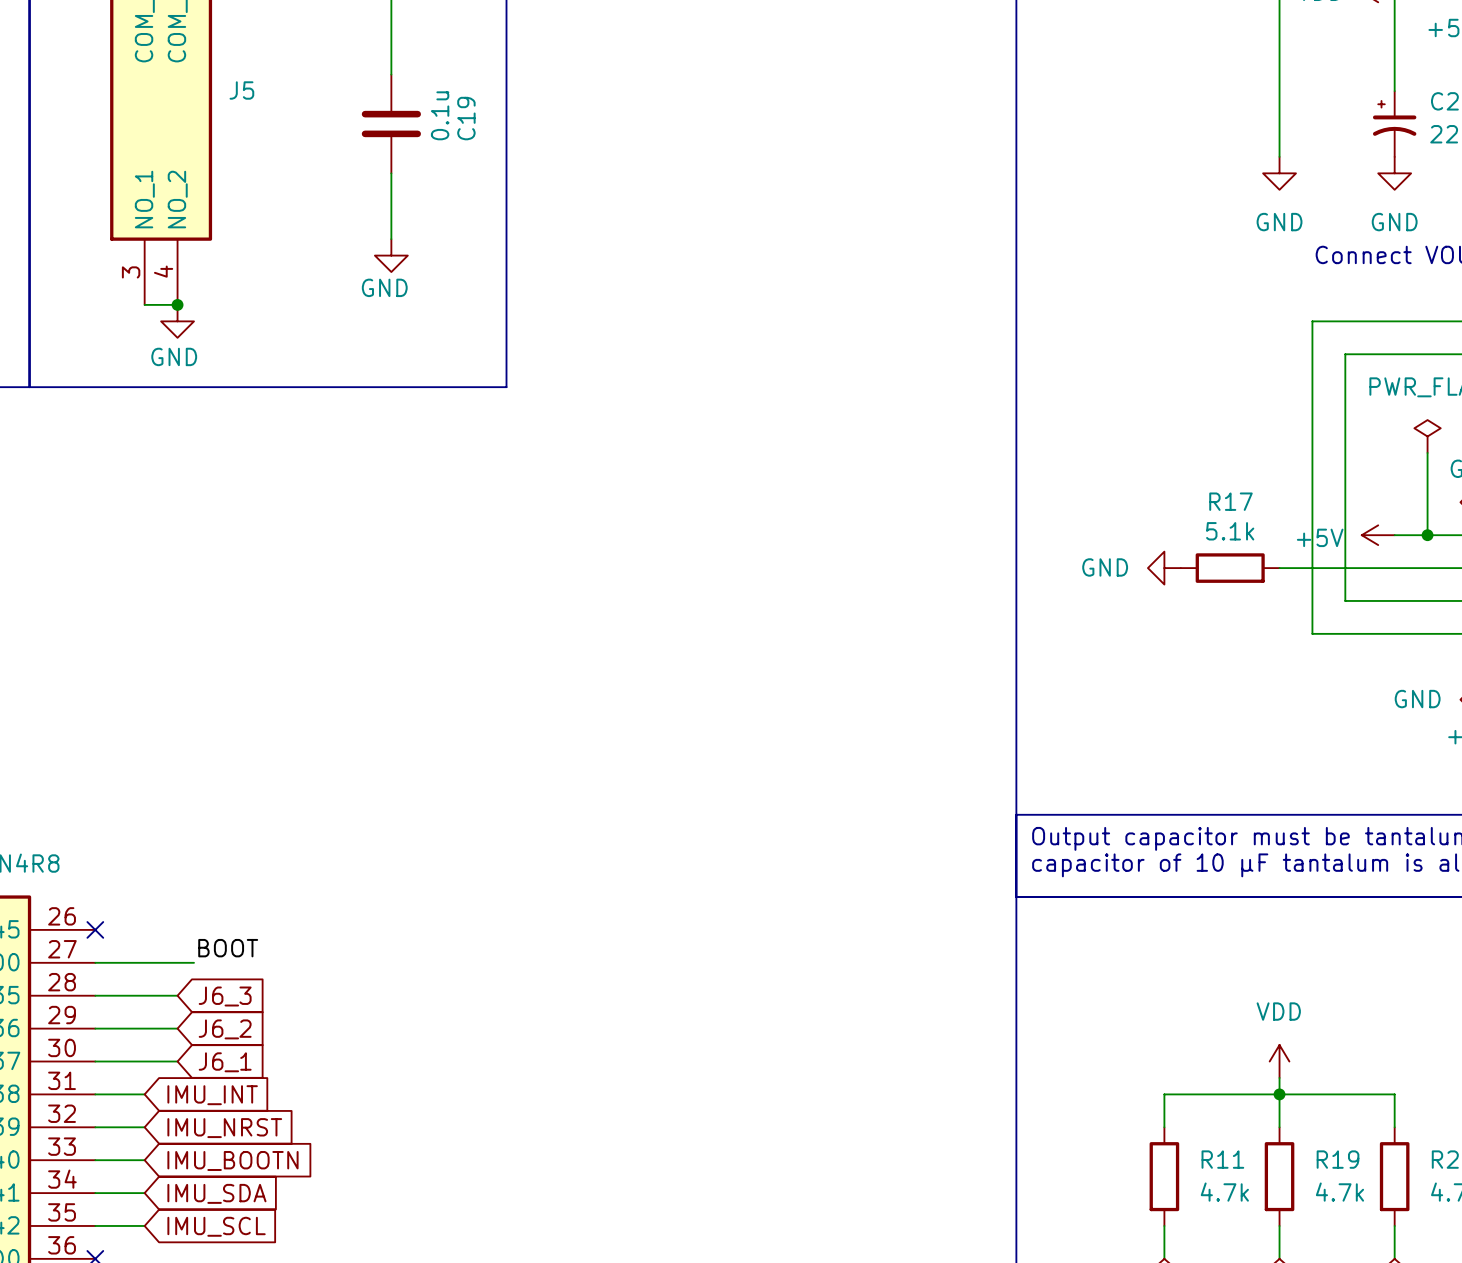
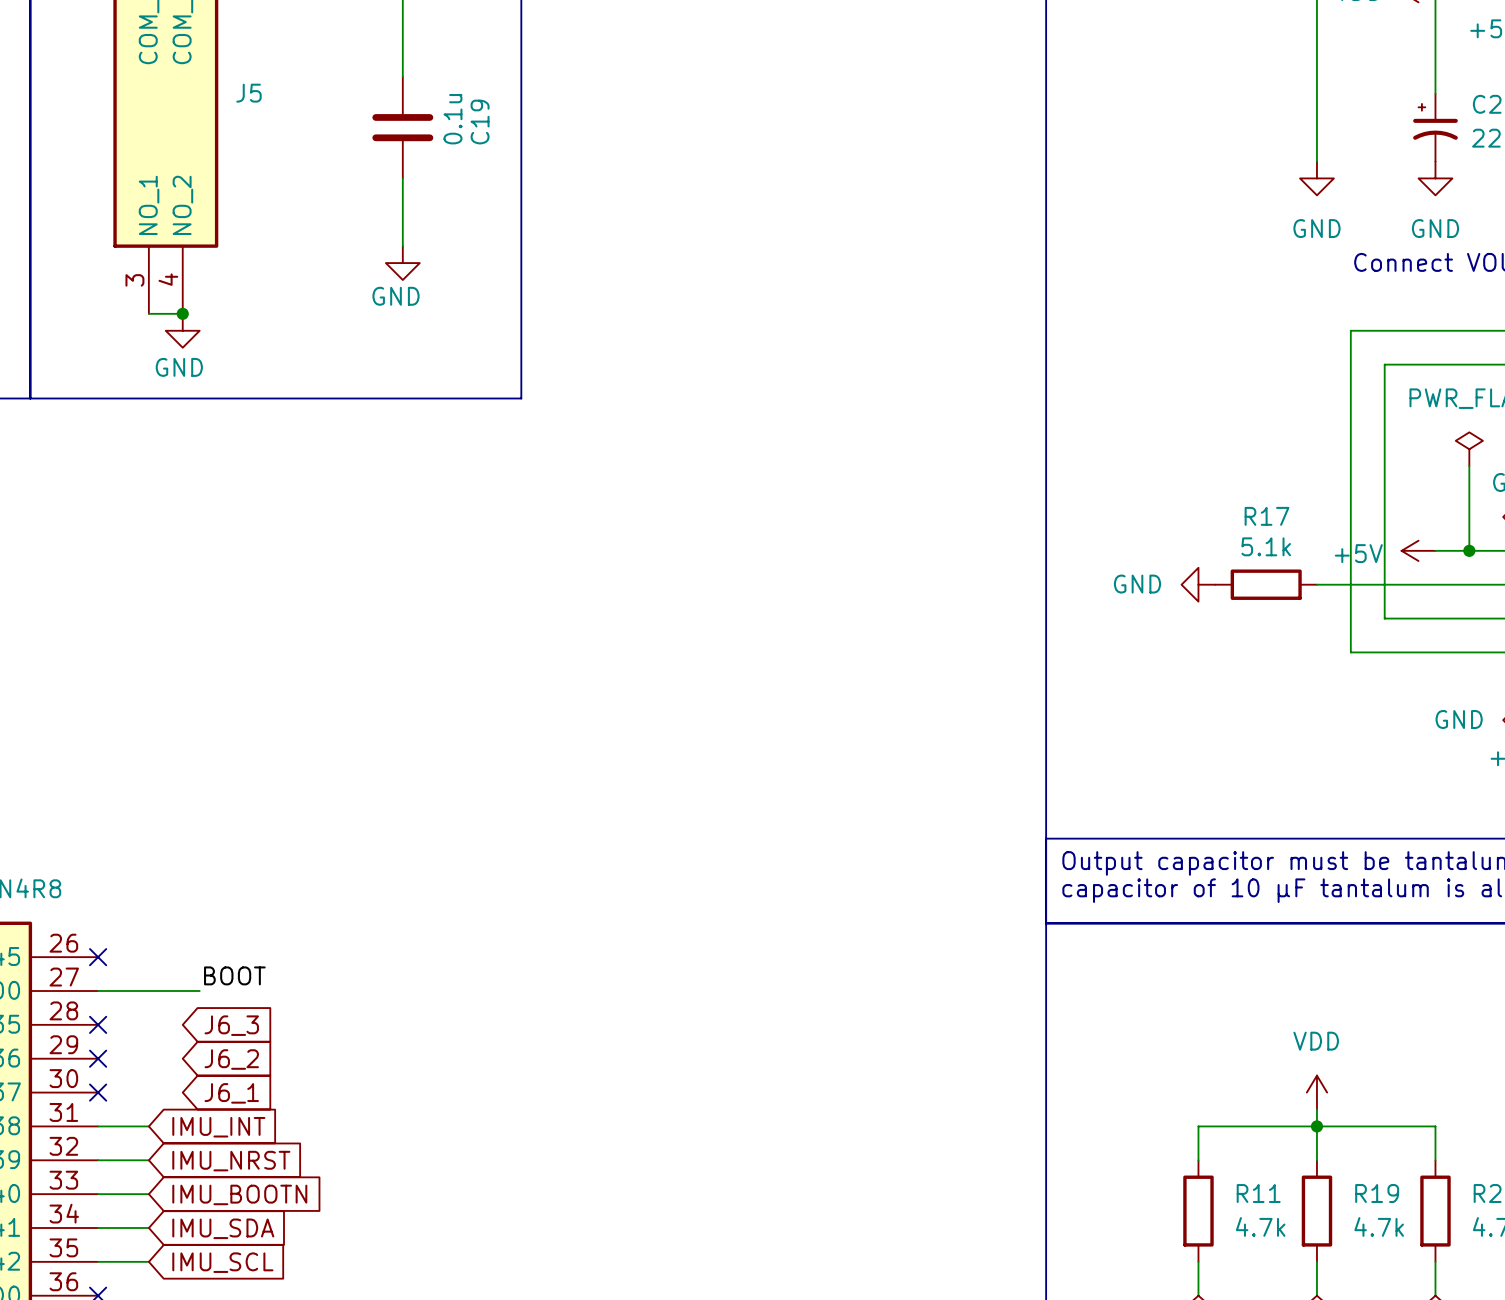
wire: (95, 995) (177, 995) -> none
no-connect mark: none -> (98, 1024)
wire: (95, 1028) (177, 1028) -> none
no-connect mark: none -> (98, 1058)
wire: (95, 1061) (177, 1061) -> none
no-connect mark: none -> (98, 1092)

